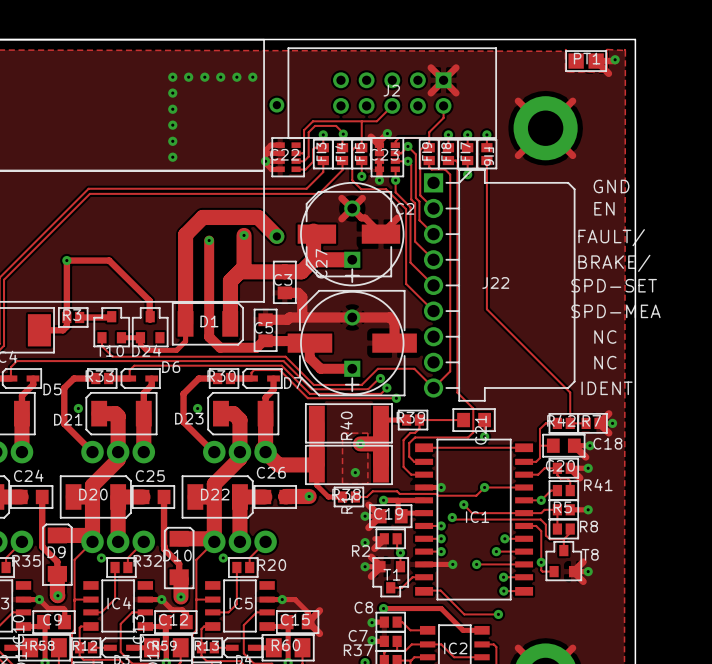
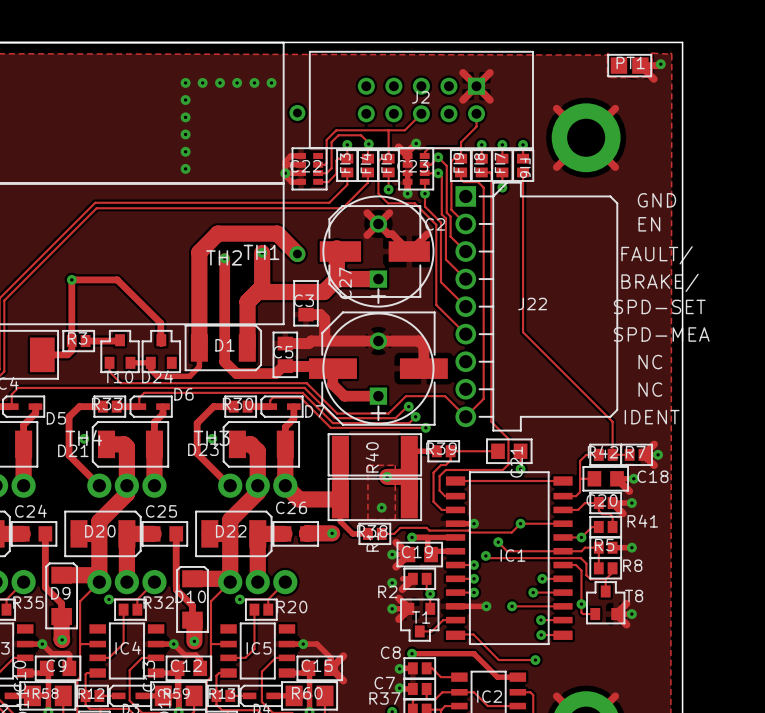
TH1 name: none -> TH1 (261, 252)
TH2 name: none -> TH2 (224, 257)
TH4 name: none -> TH4 (83, 438)
TH3 name: none -> TH3 (211, 438)

